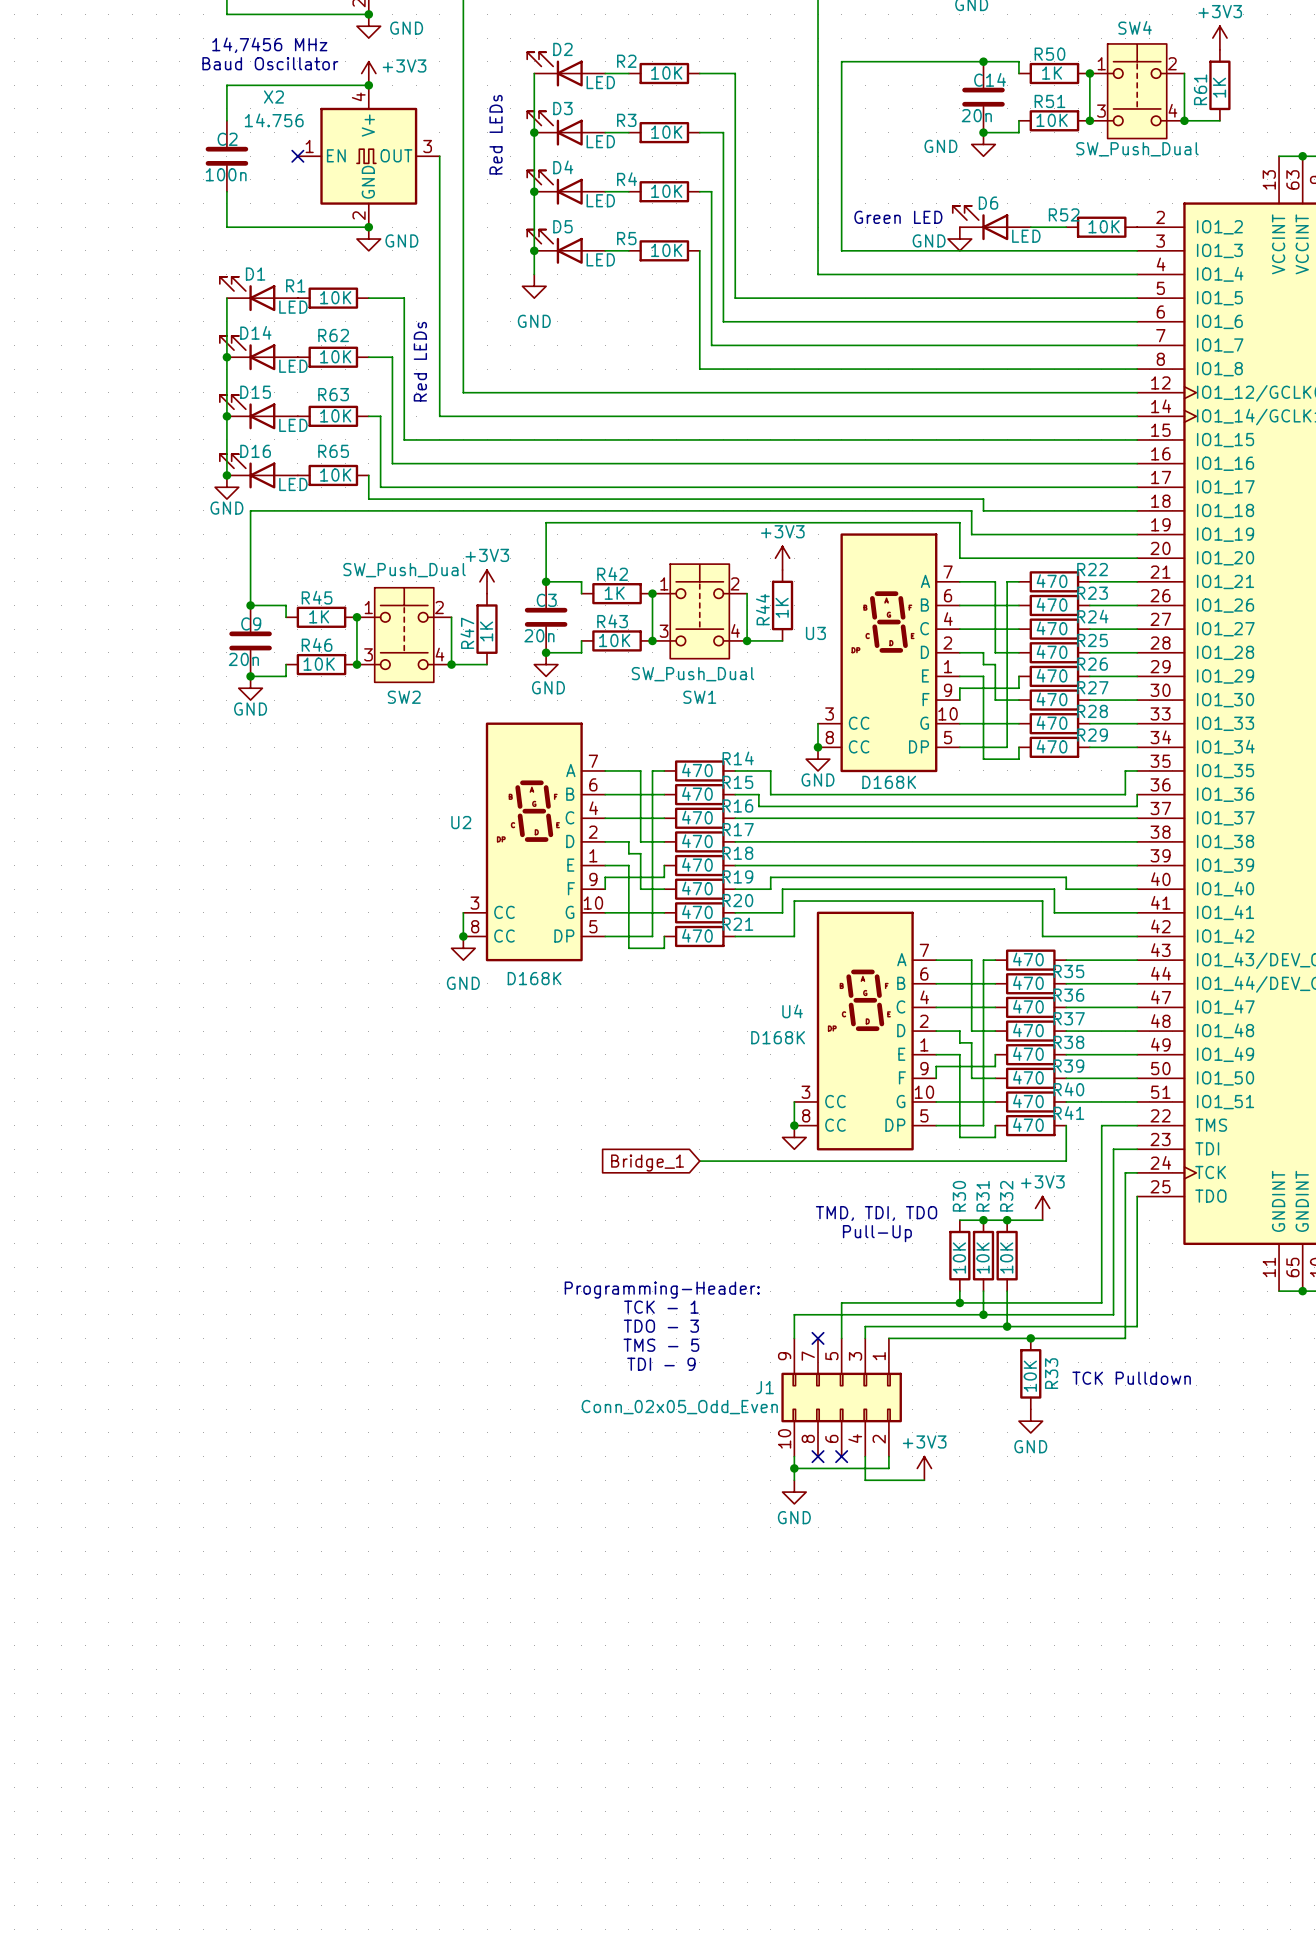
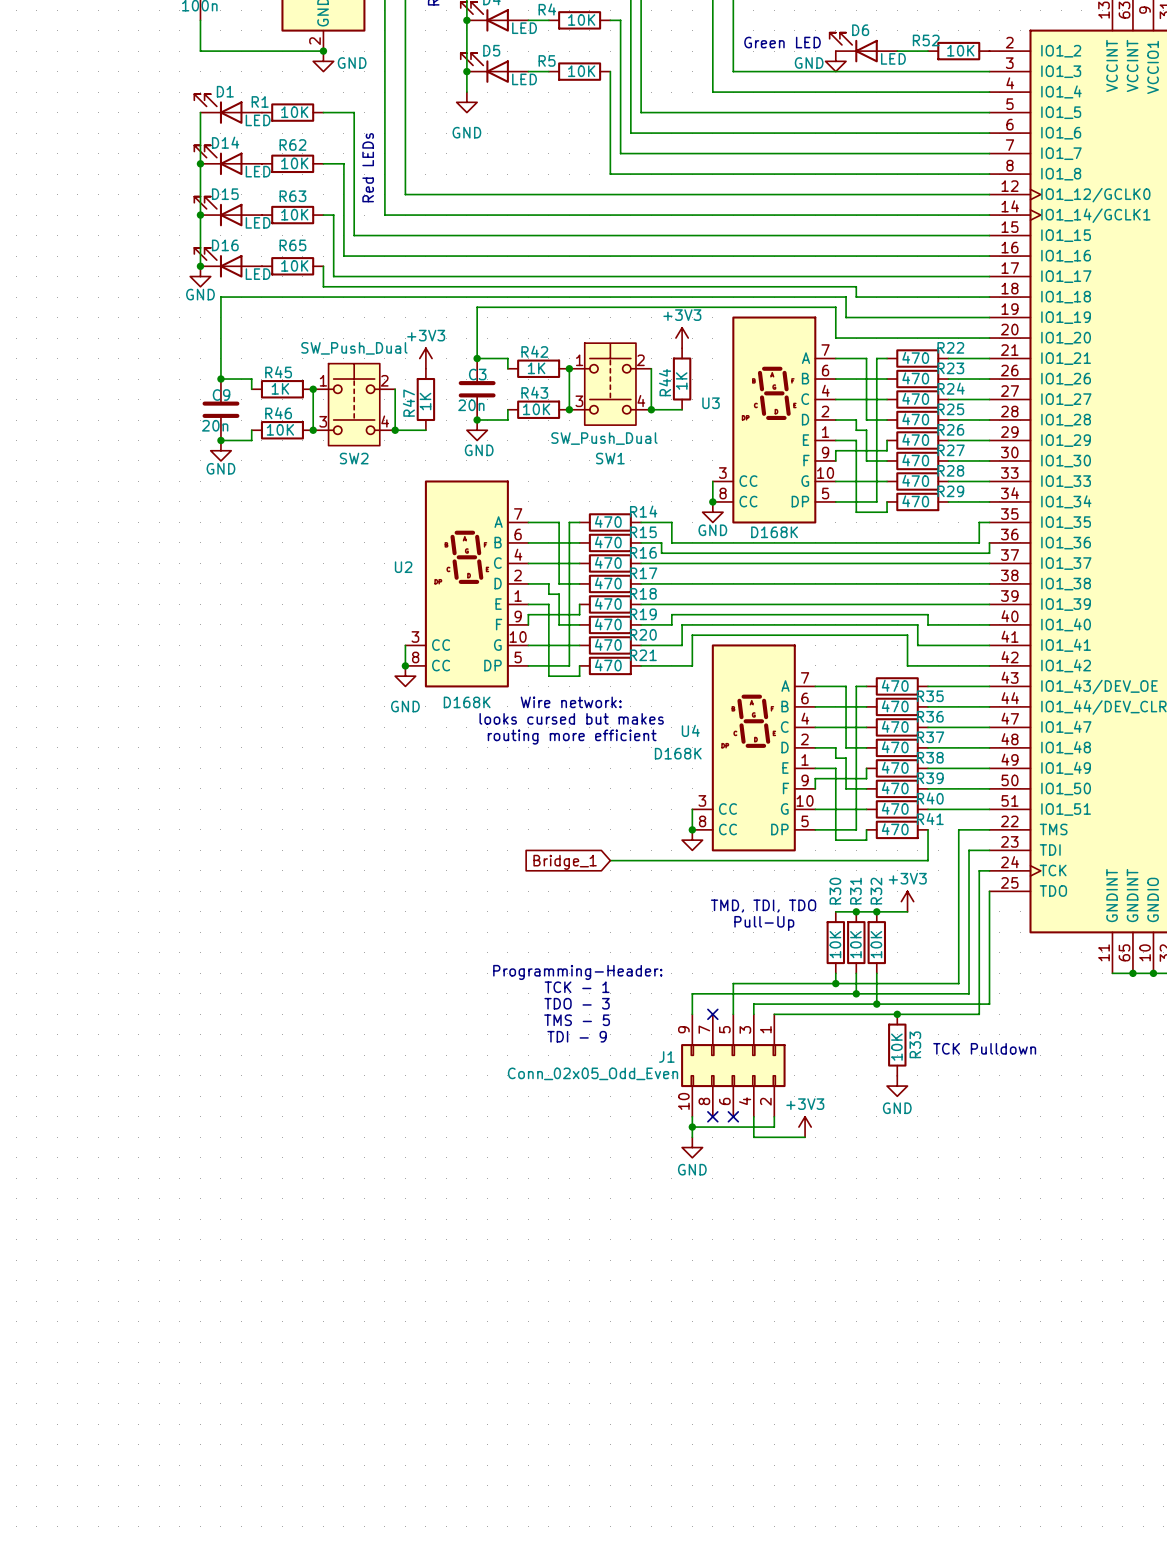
text: none -> Wire network: (571, 702)
text: none -> looks cursed but makes (571, 718)
text: none -> routing more efficient (572, 737)

